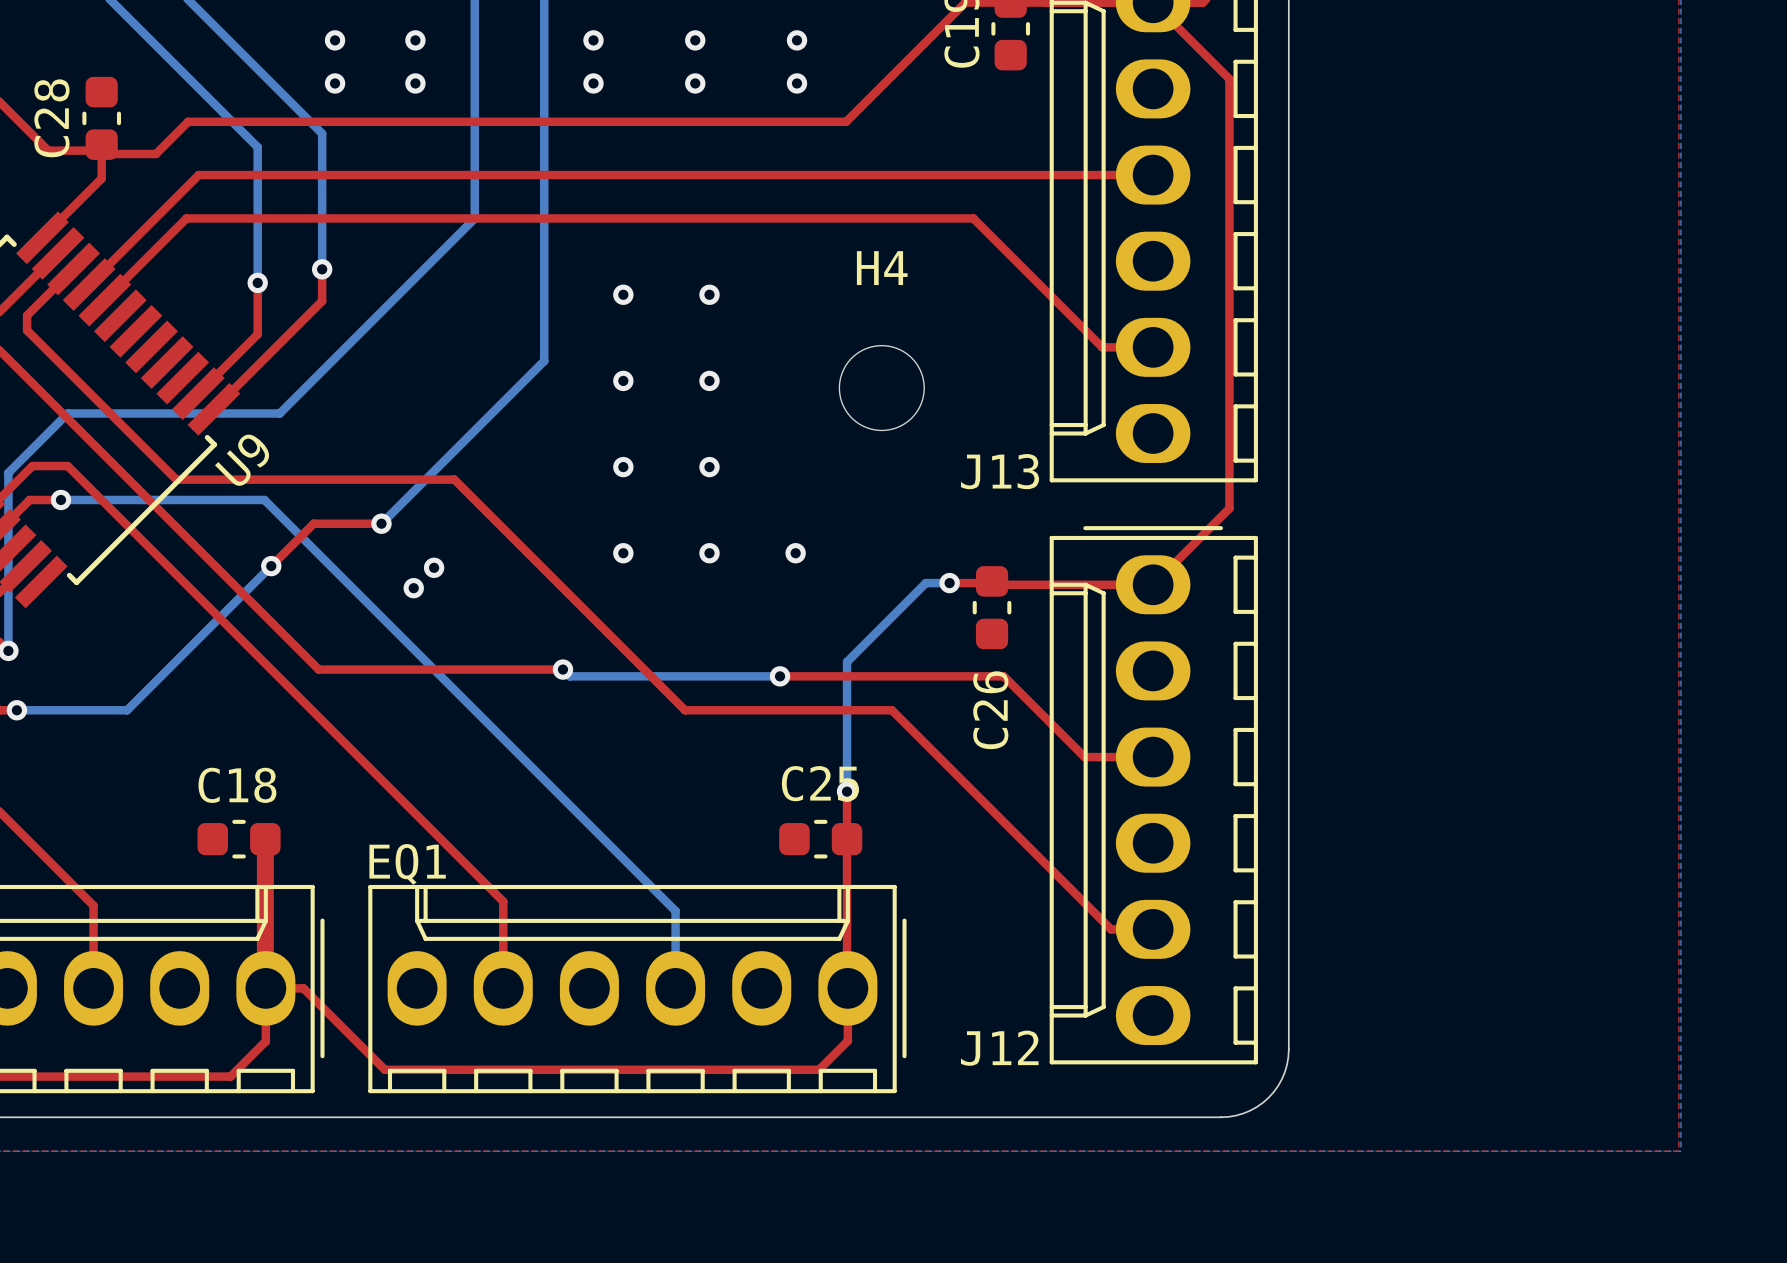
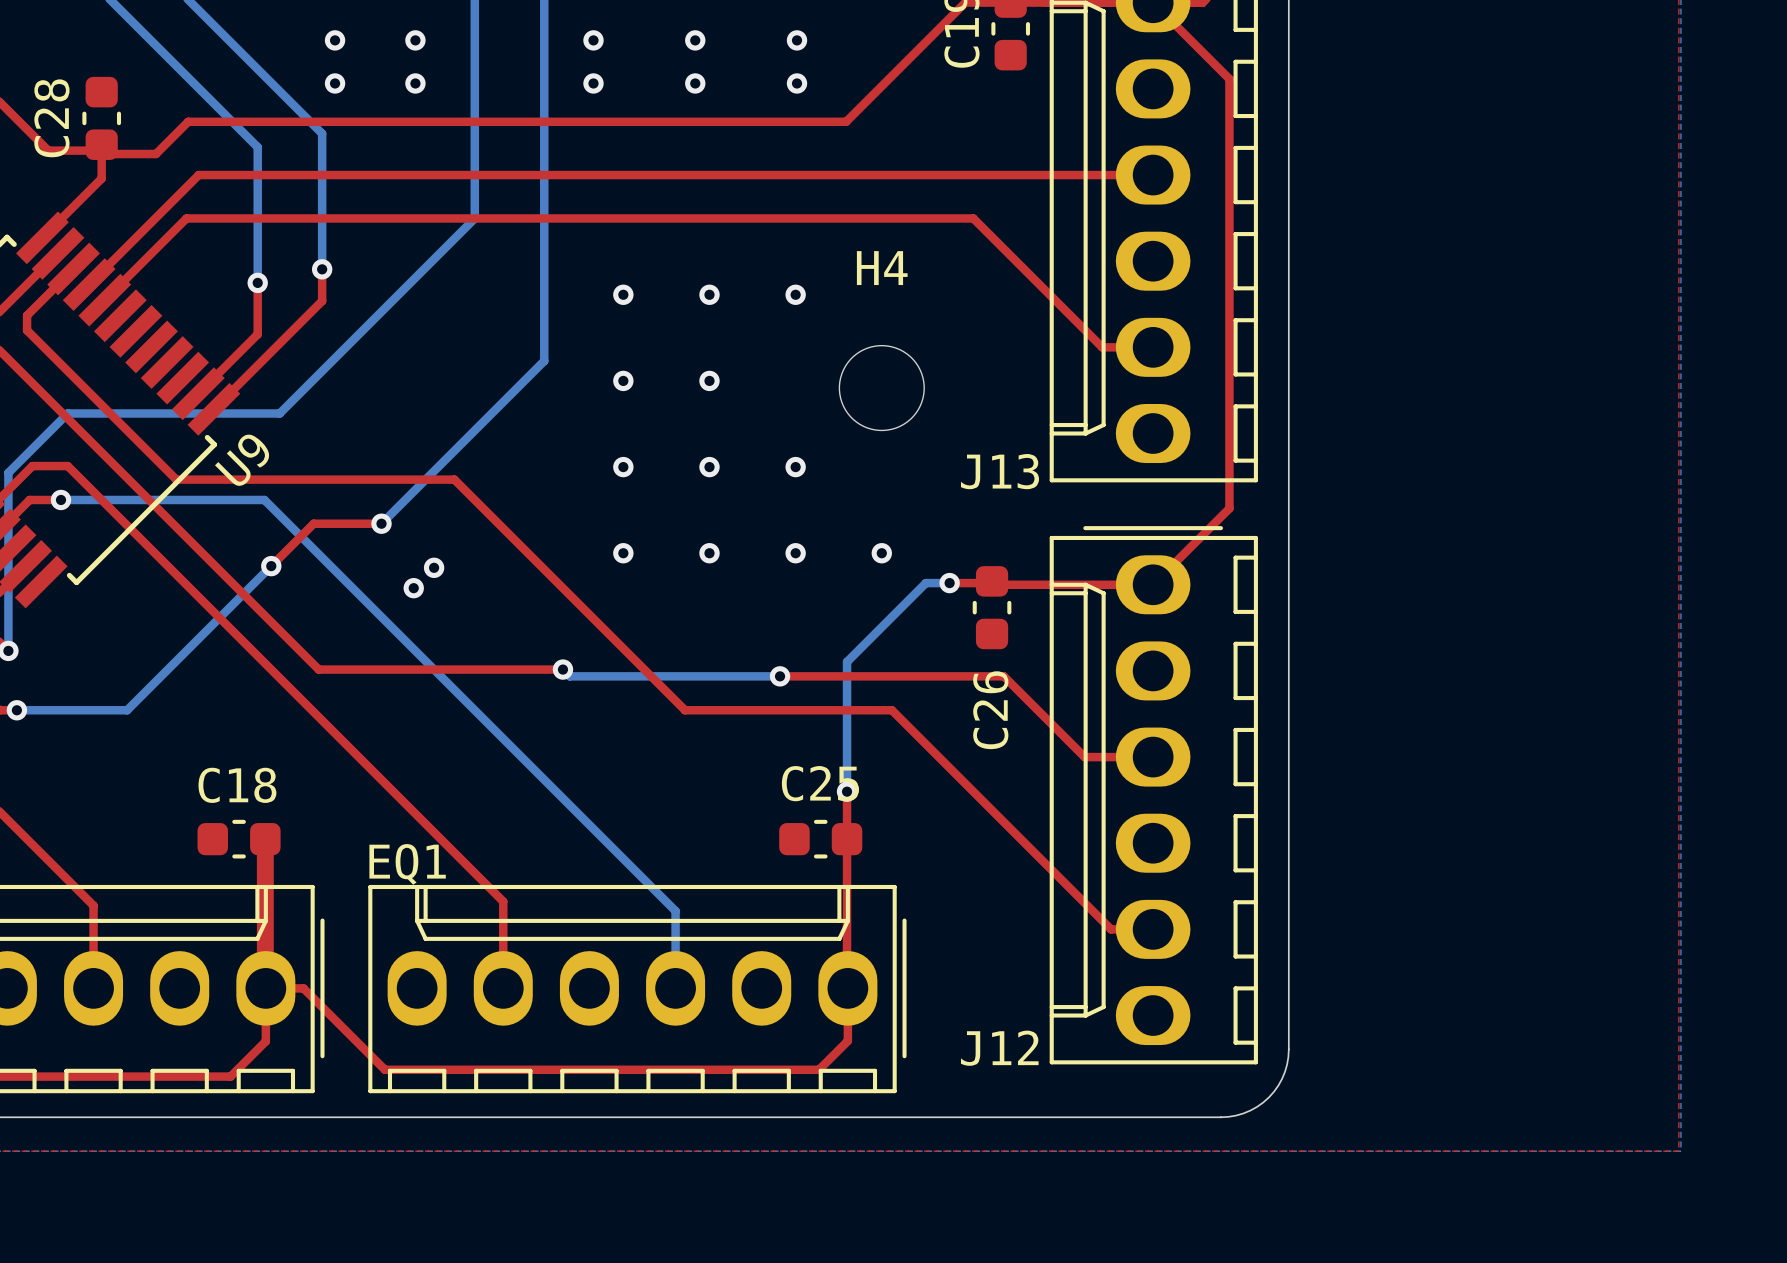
via: none -> (795, 294)
via: none -> (795, 467)
via: none -> (881, 553)

